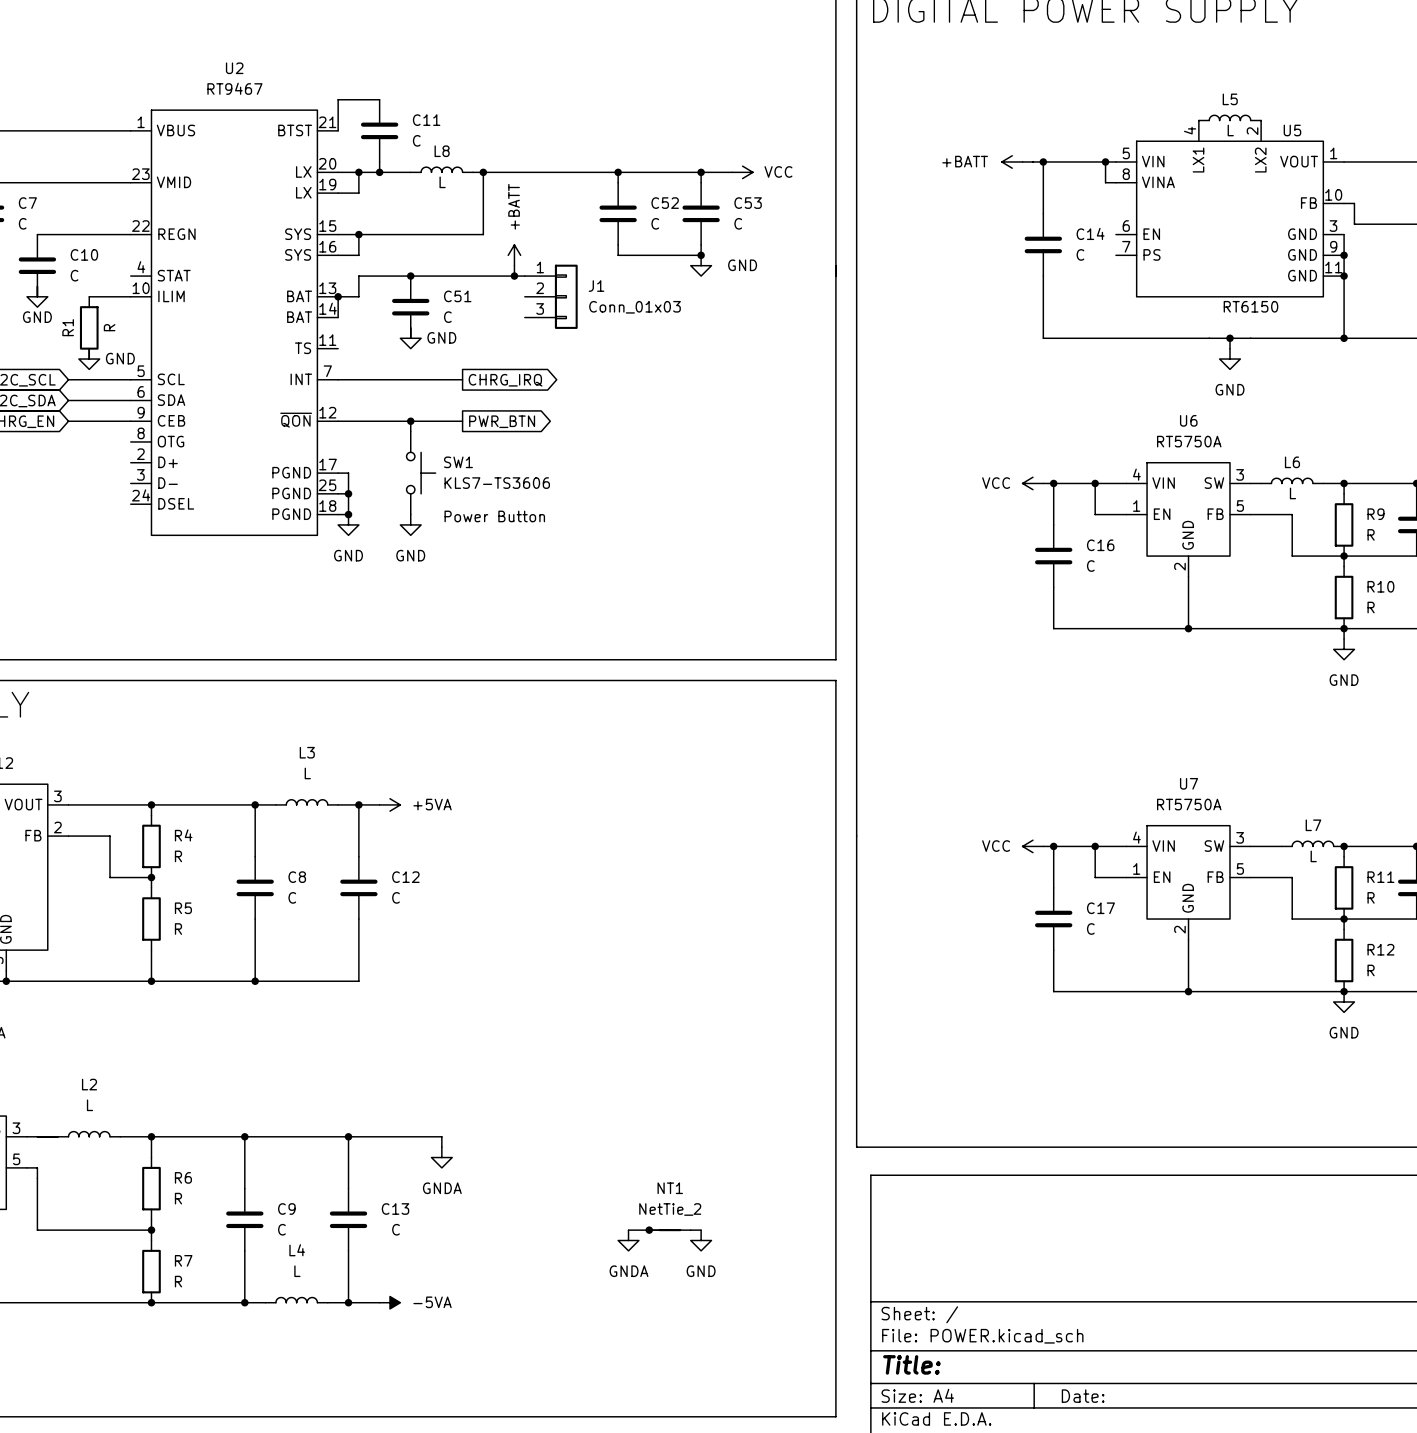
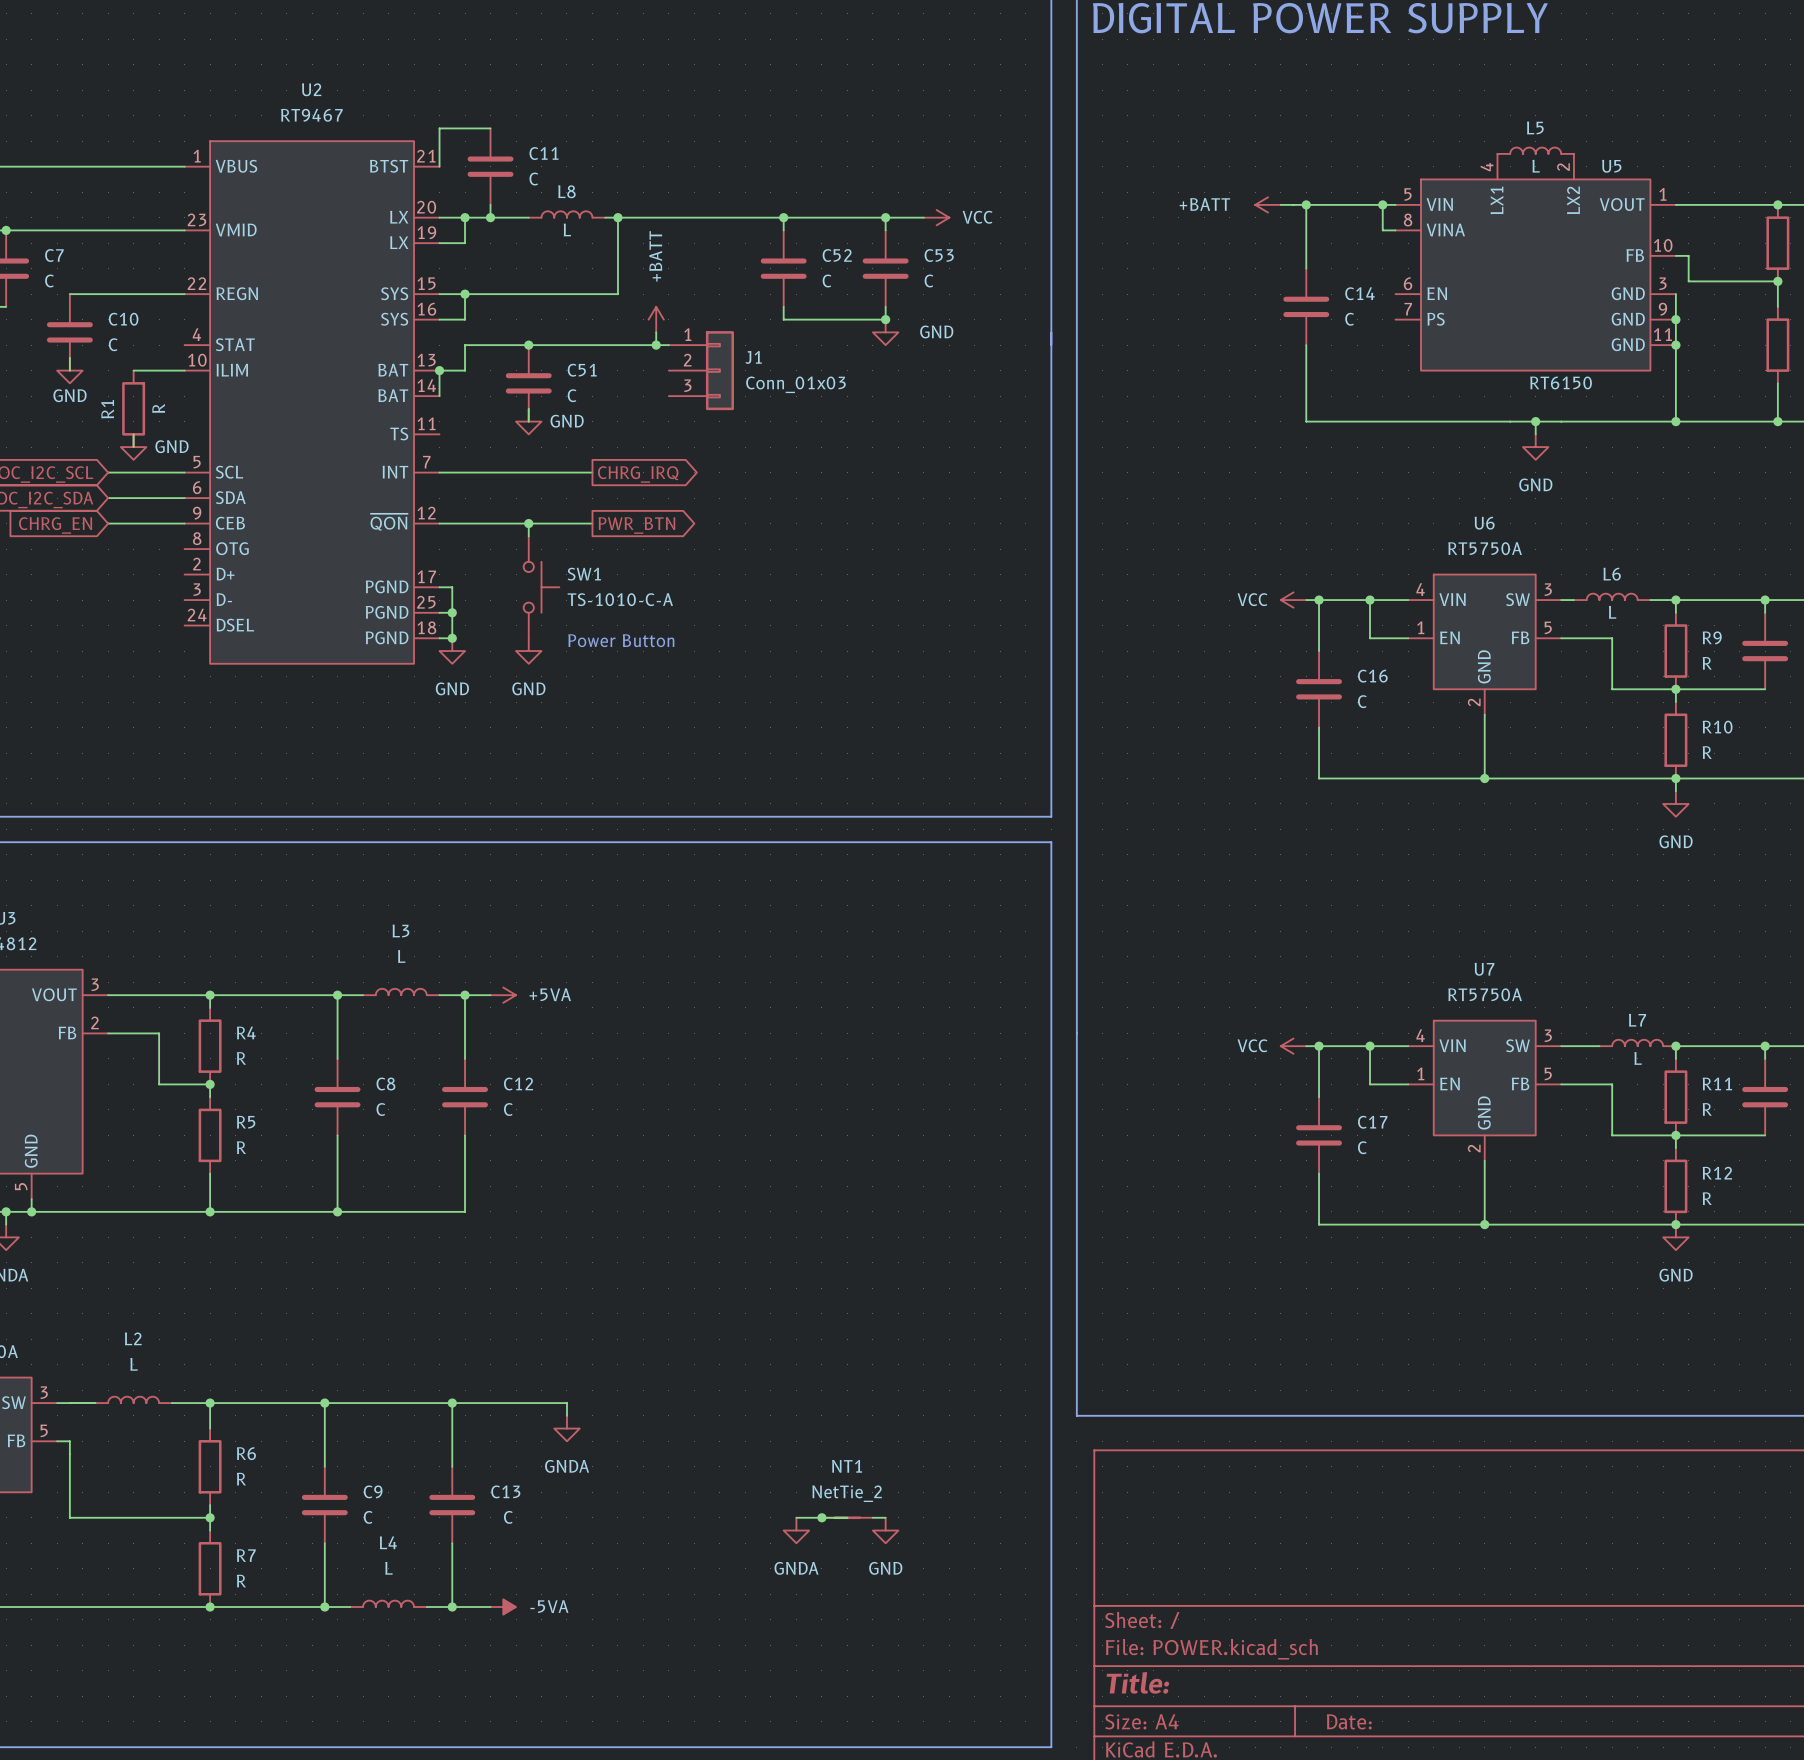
SW1 value: KLS7-TS3606 (497, 483) -> TS-1010-C-A (620, 599)

